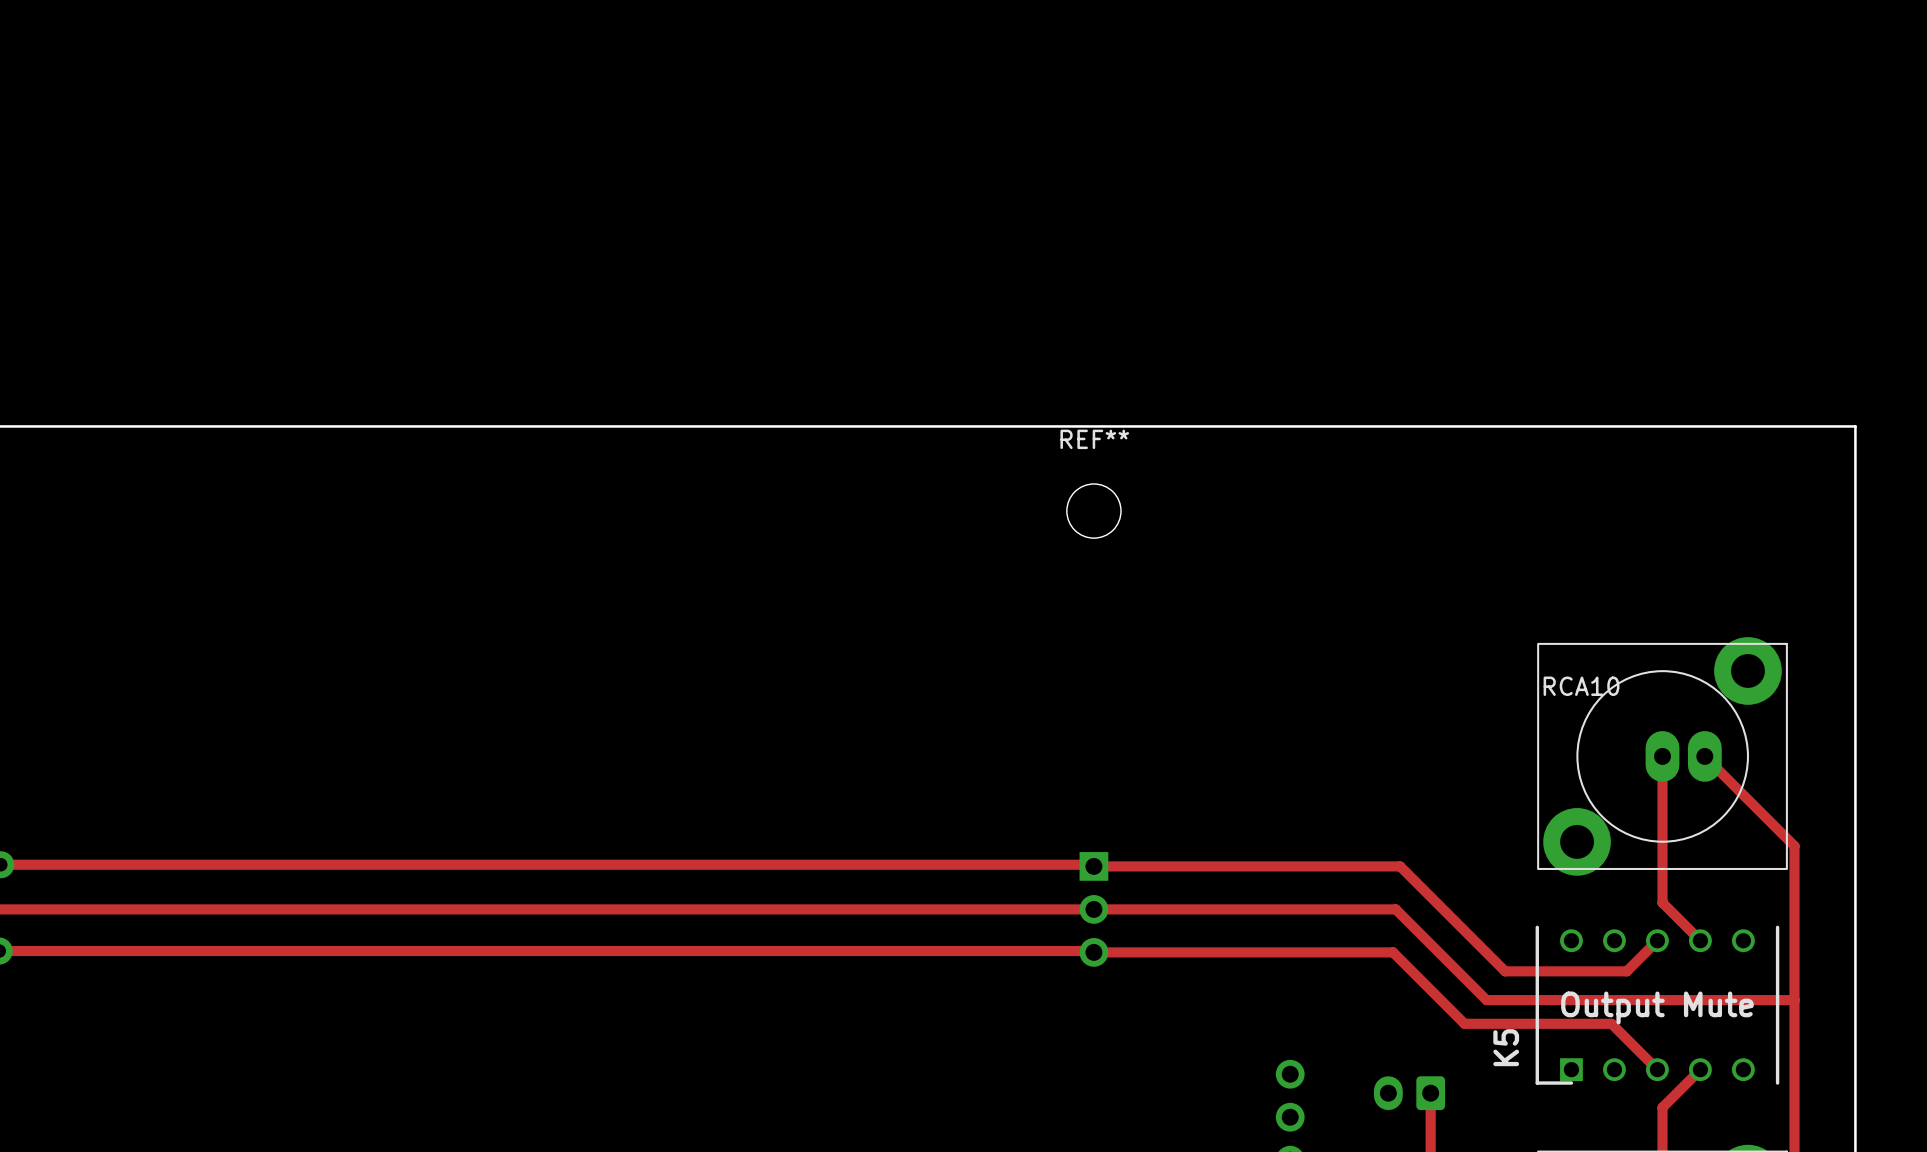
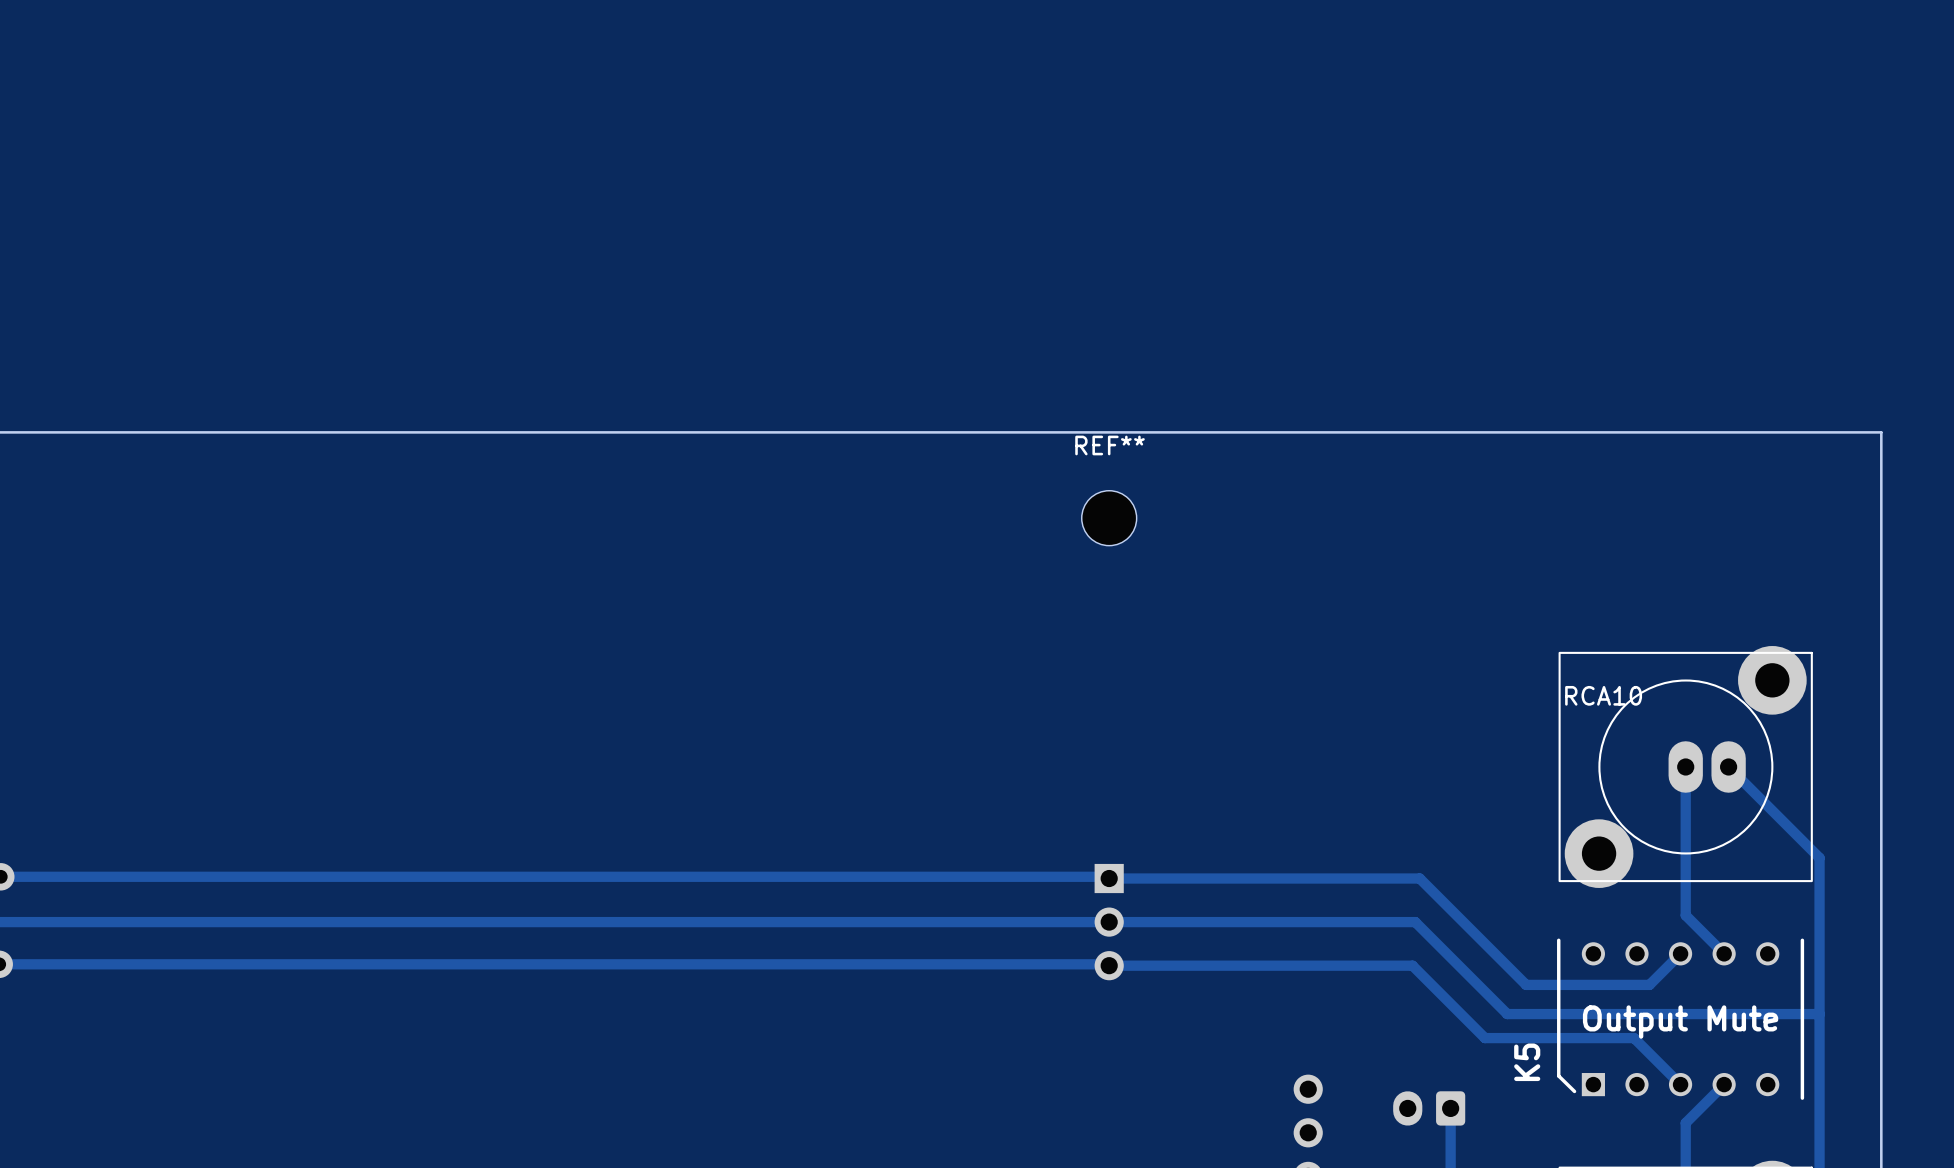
K5 footprint: [1535, 925, 1780, 1085] -> [1557, 938, 1805, 1100]

